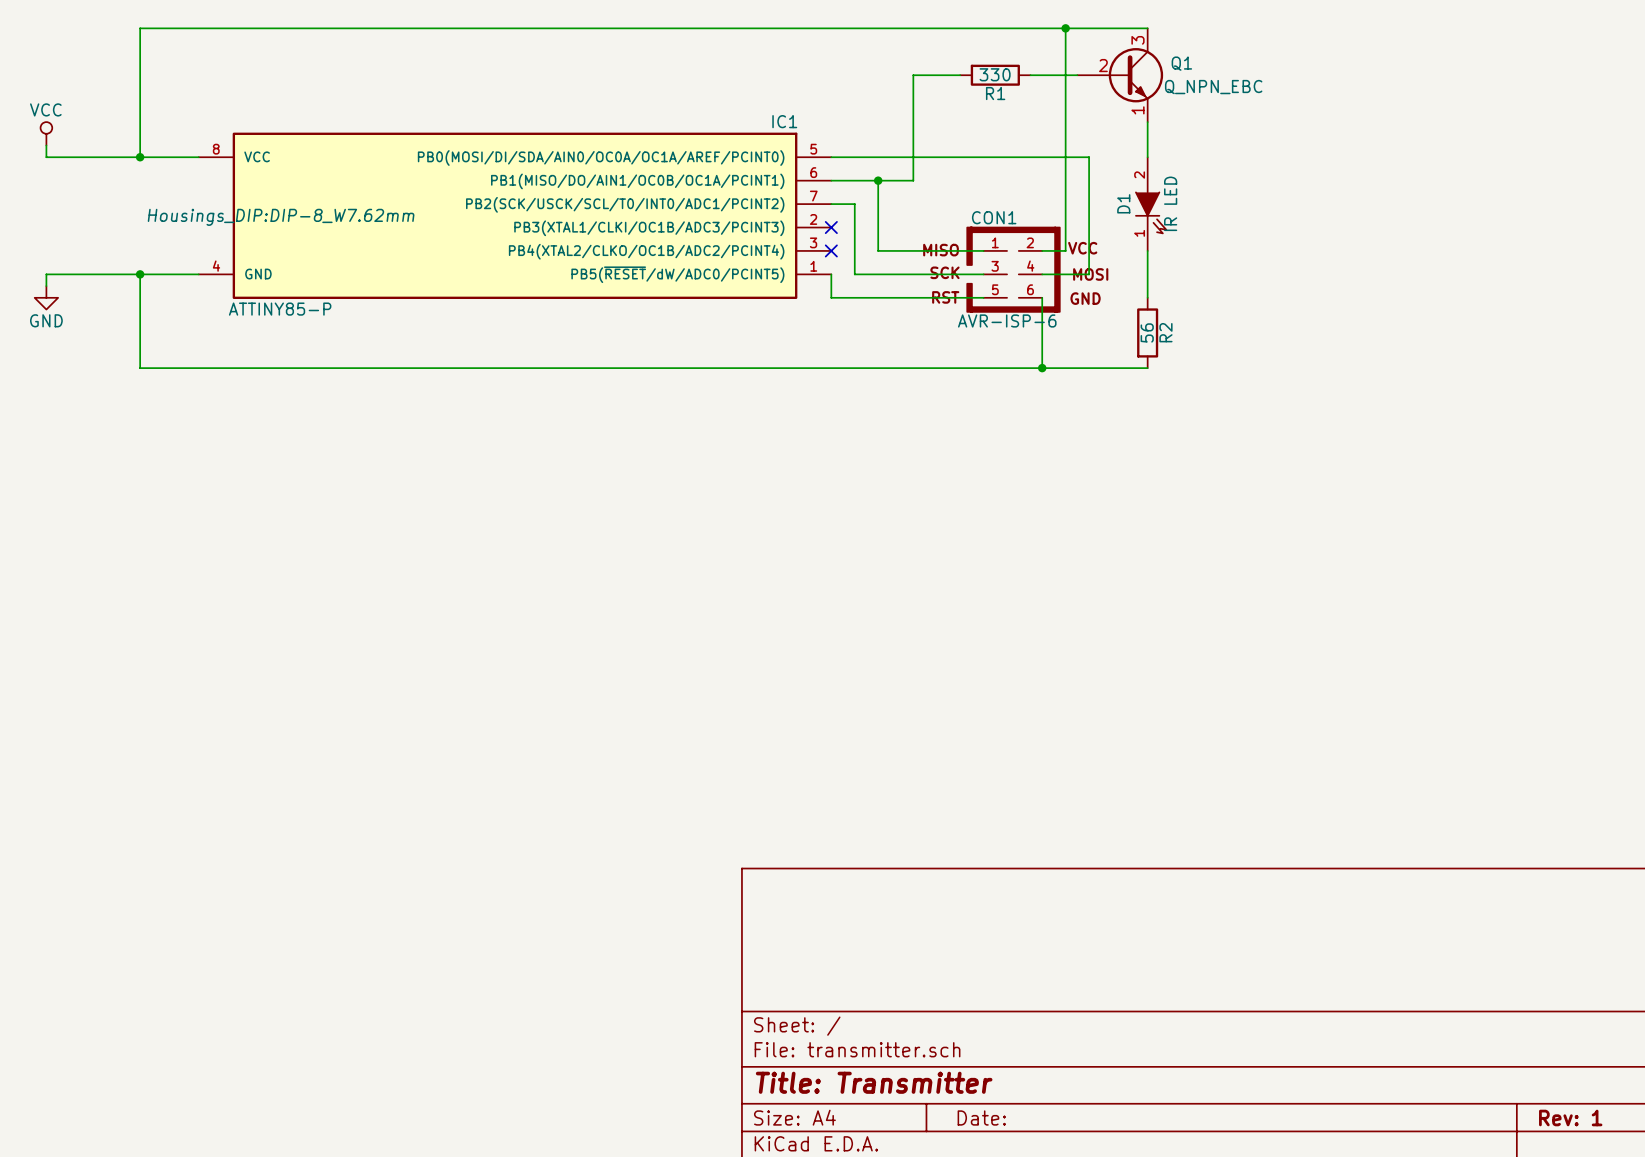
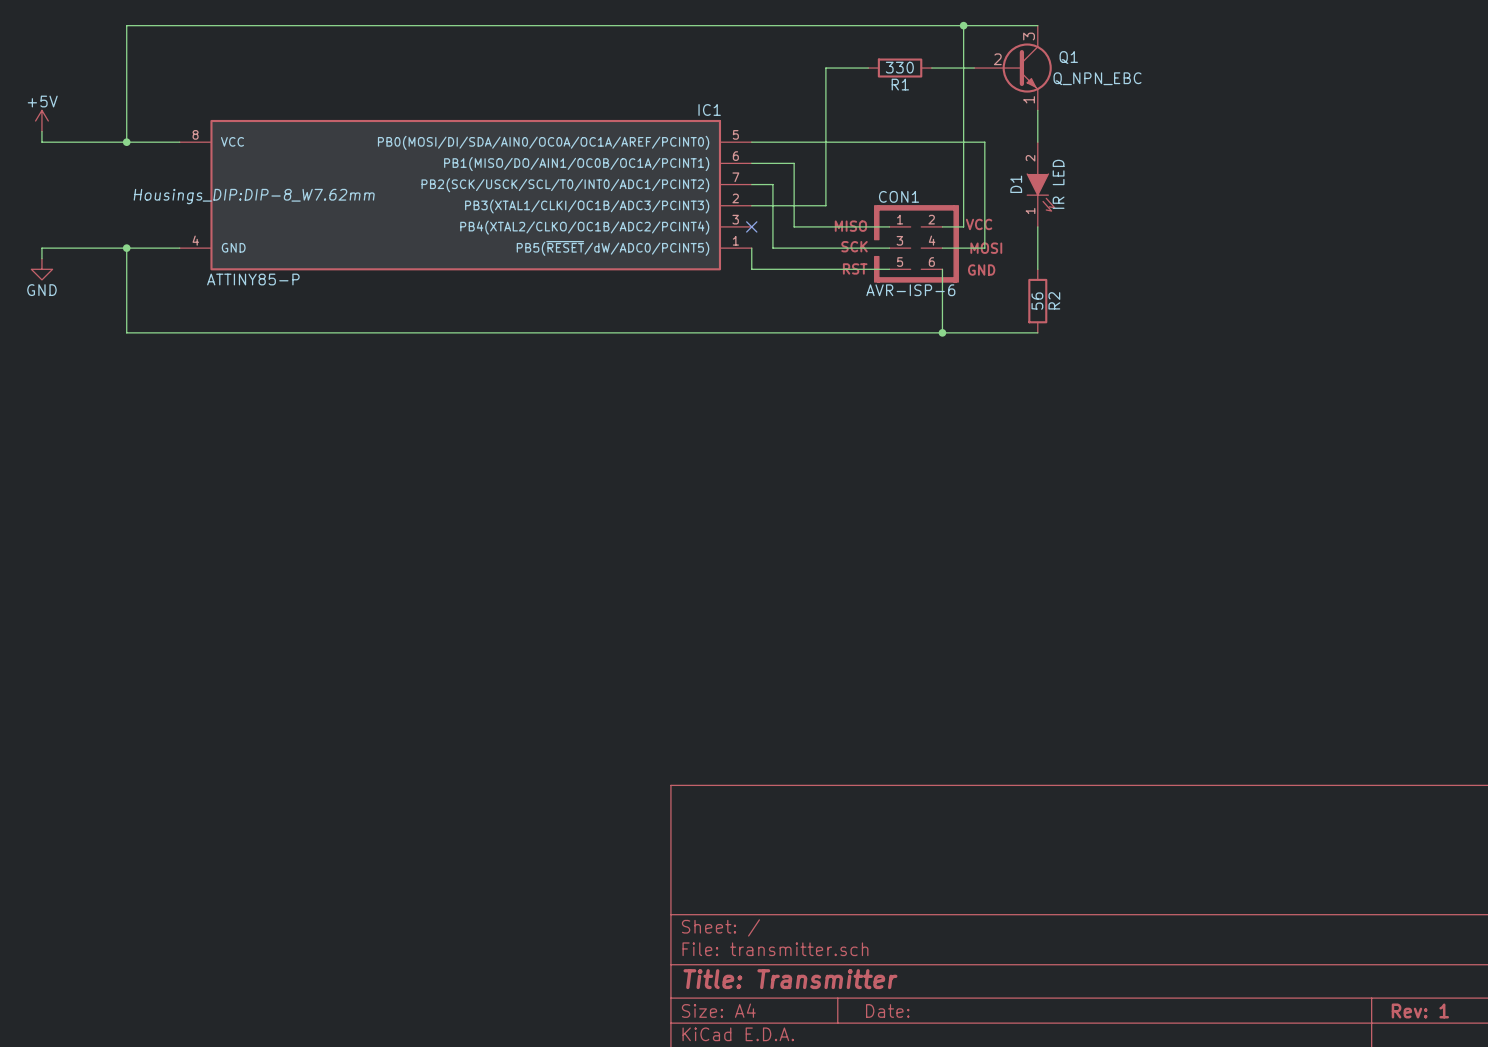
power symbol: VCC (46, 133) -> +5V (41, 120)
wire: (878, 180) (913, 180) -> (751, 205) (825, 205) (825, 163)
junction: (878, 180) -> none
no-connect mark: (831, 227) -> none

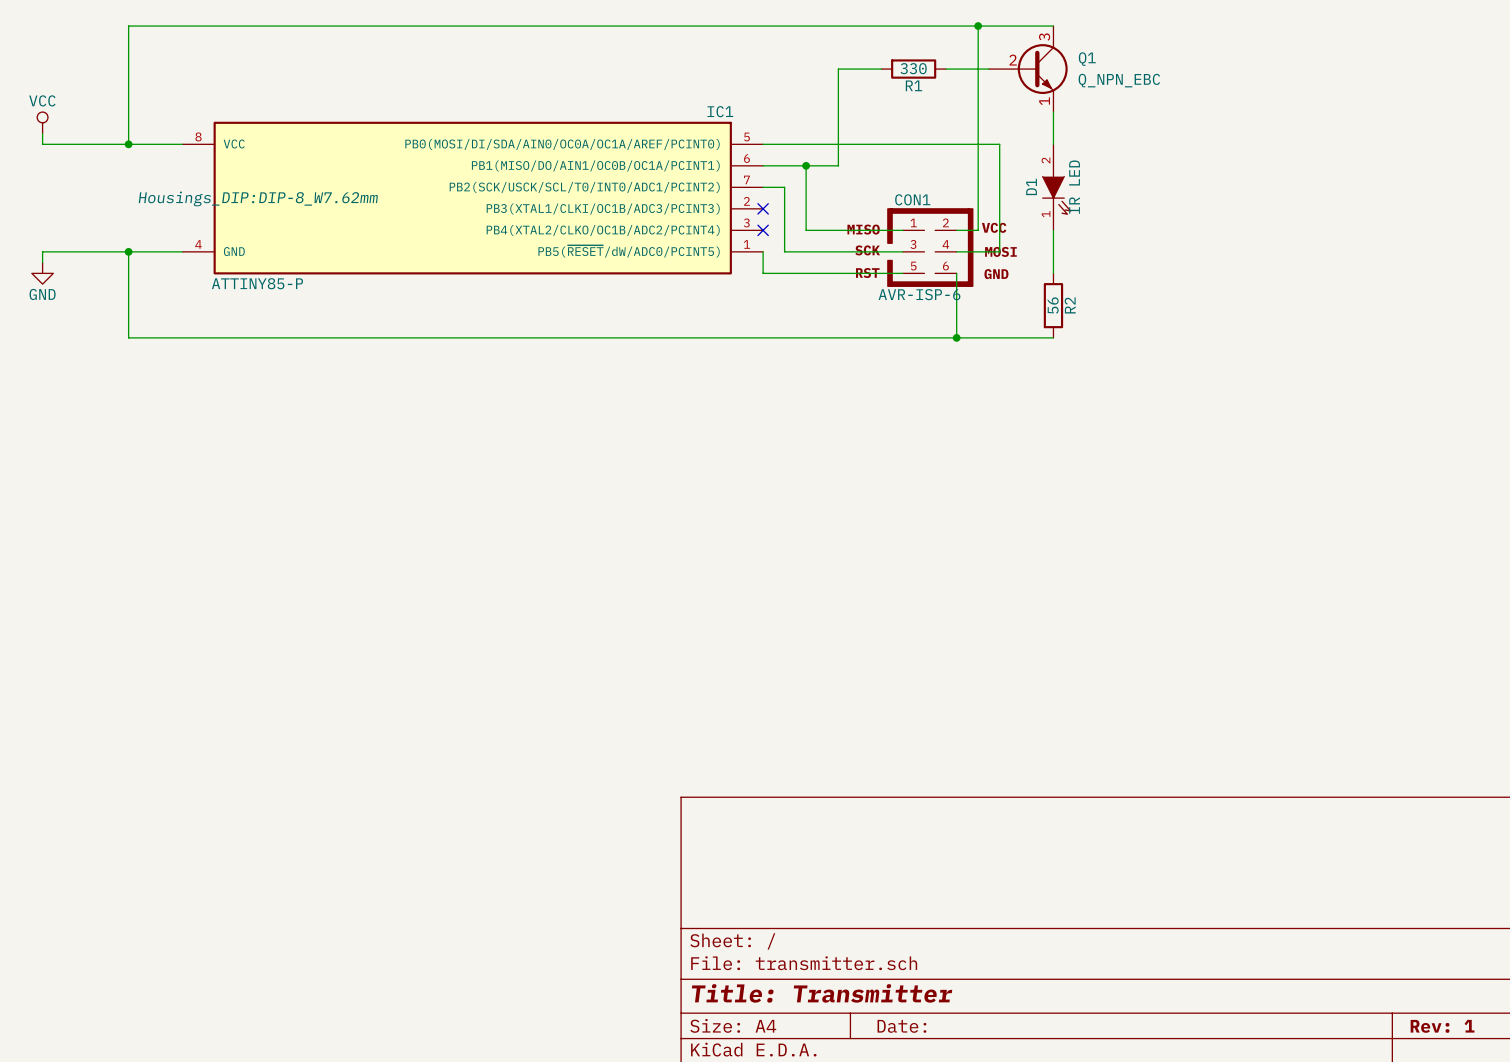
power symbol: +5V (41, 120) -> VCC (42, 122)
junction: none -> (806, 165)
wire: (825, 163) (825, 205) (751, 205) -> (838, 165) (806, 165)
no-connect mark: none -> (763, 208)

